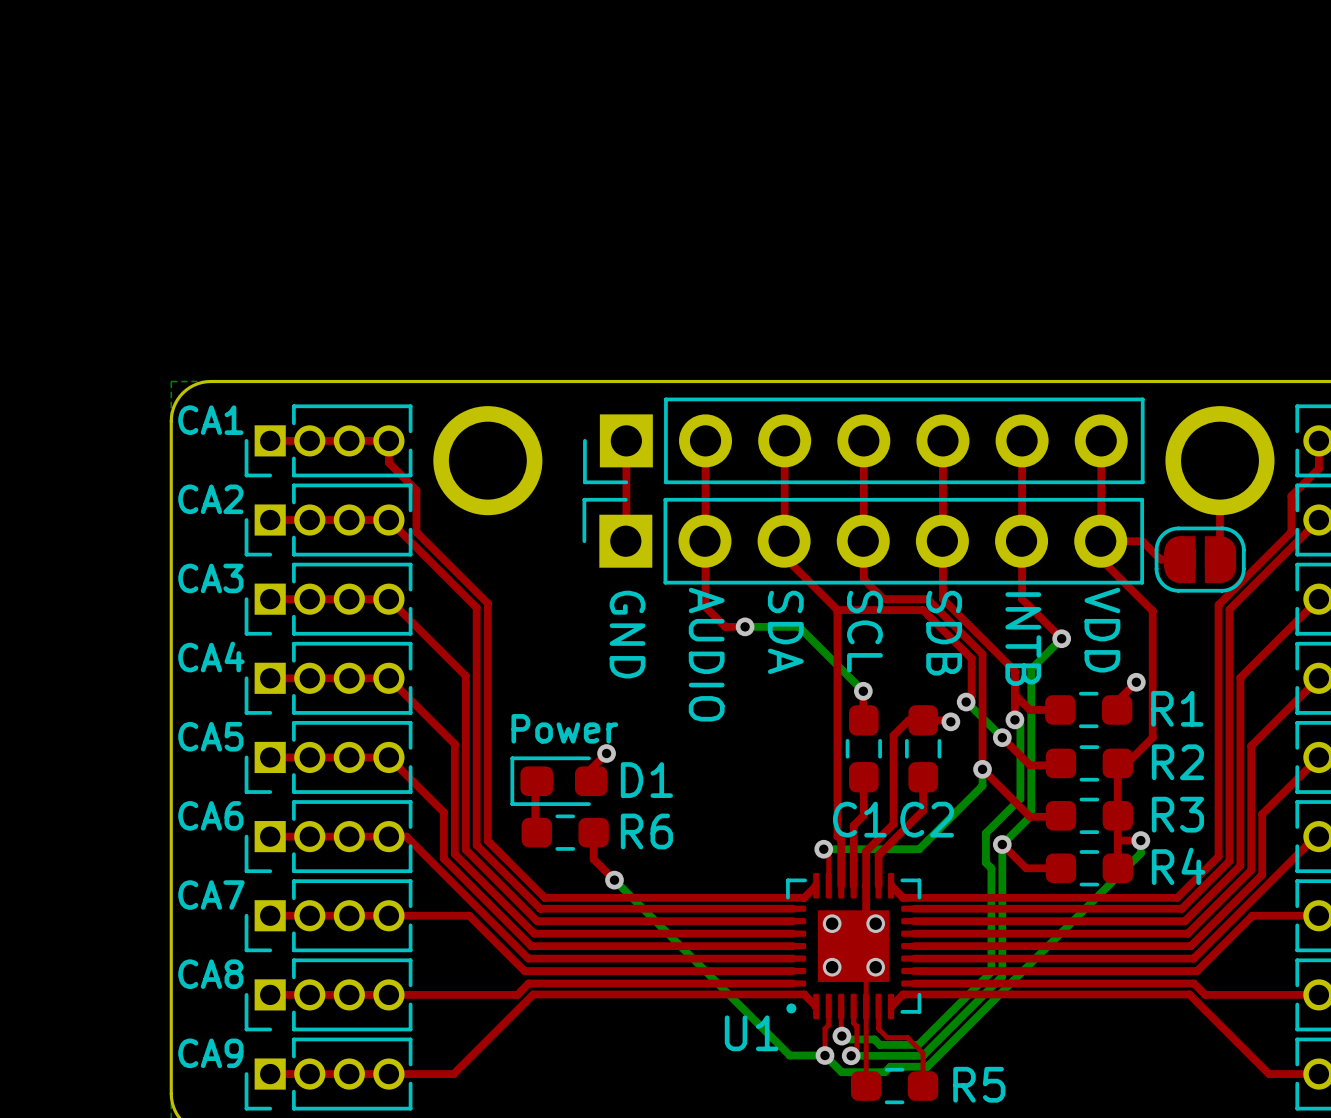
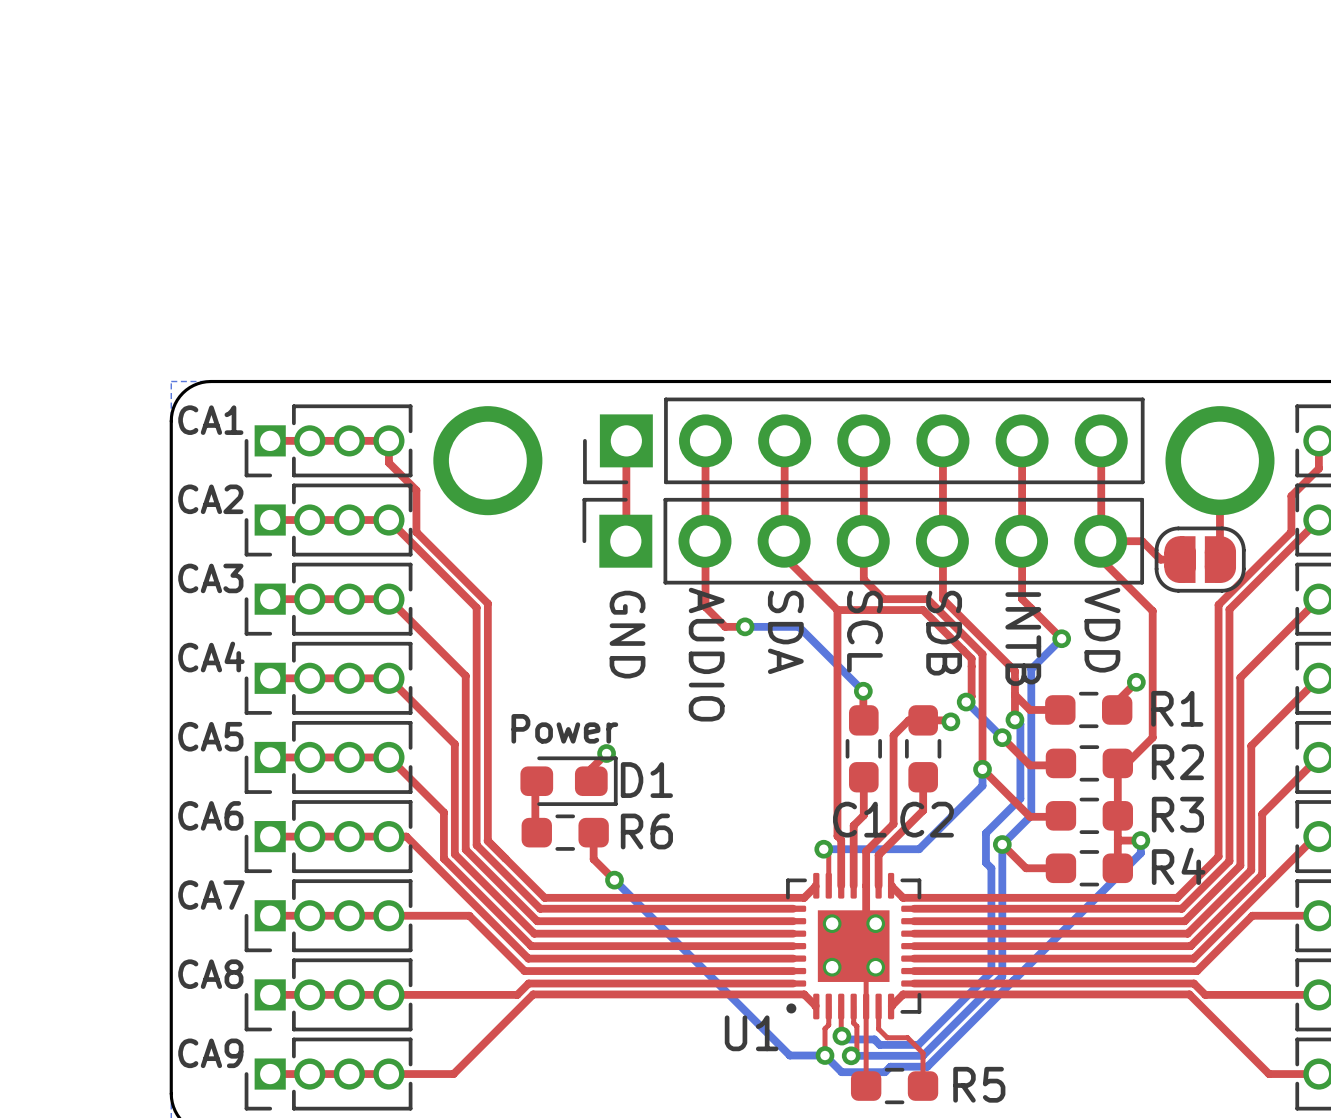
D1 rotation: 0° (559, 781) -> 180° (569, 781)

